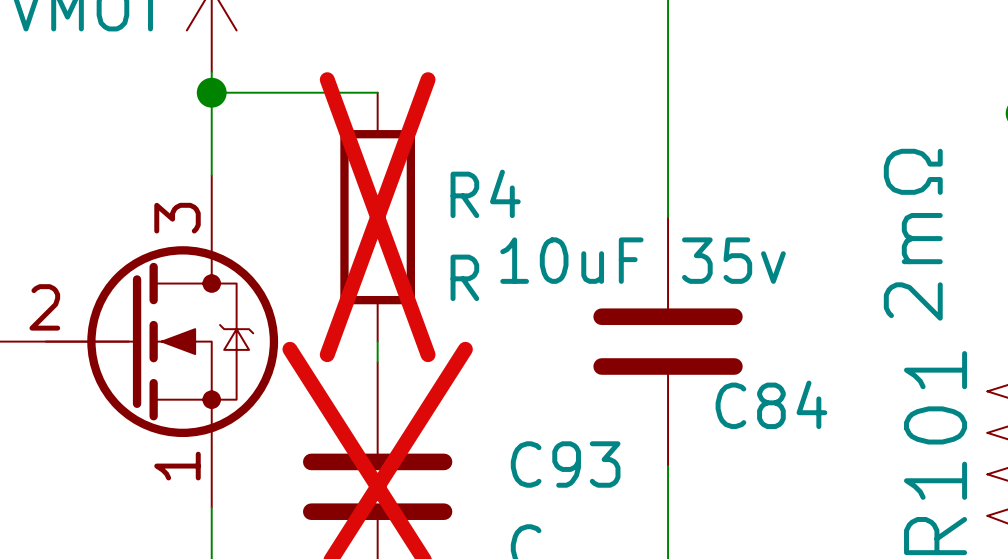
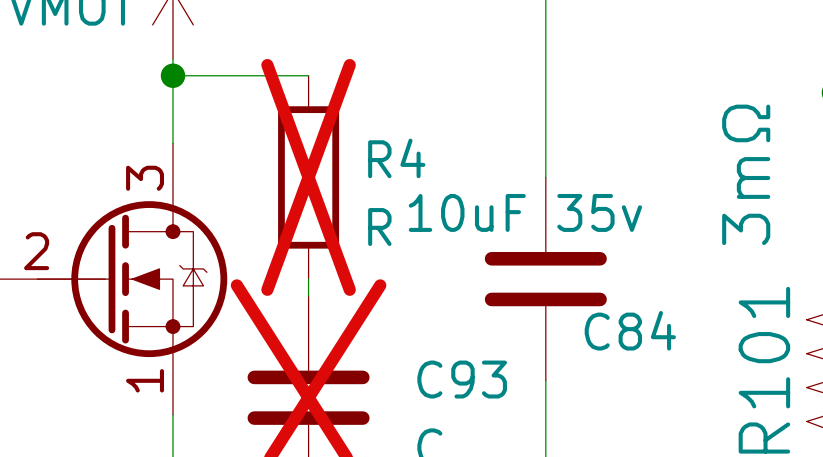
R101 value: 2mΩ (913, 234) -> 3mΩ (746, 174)

